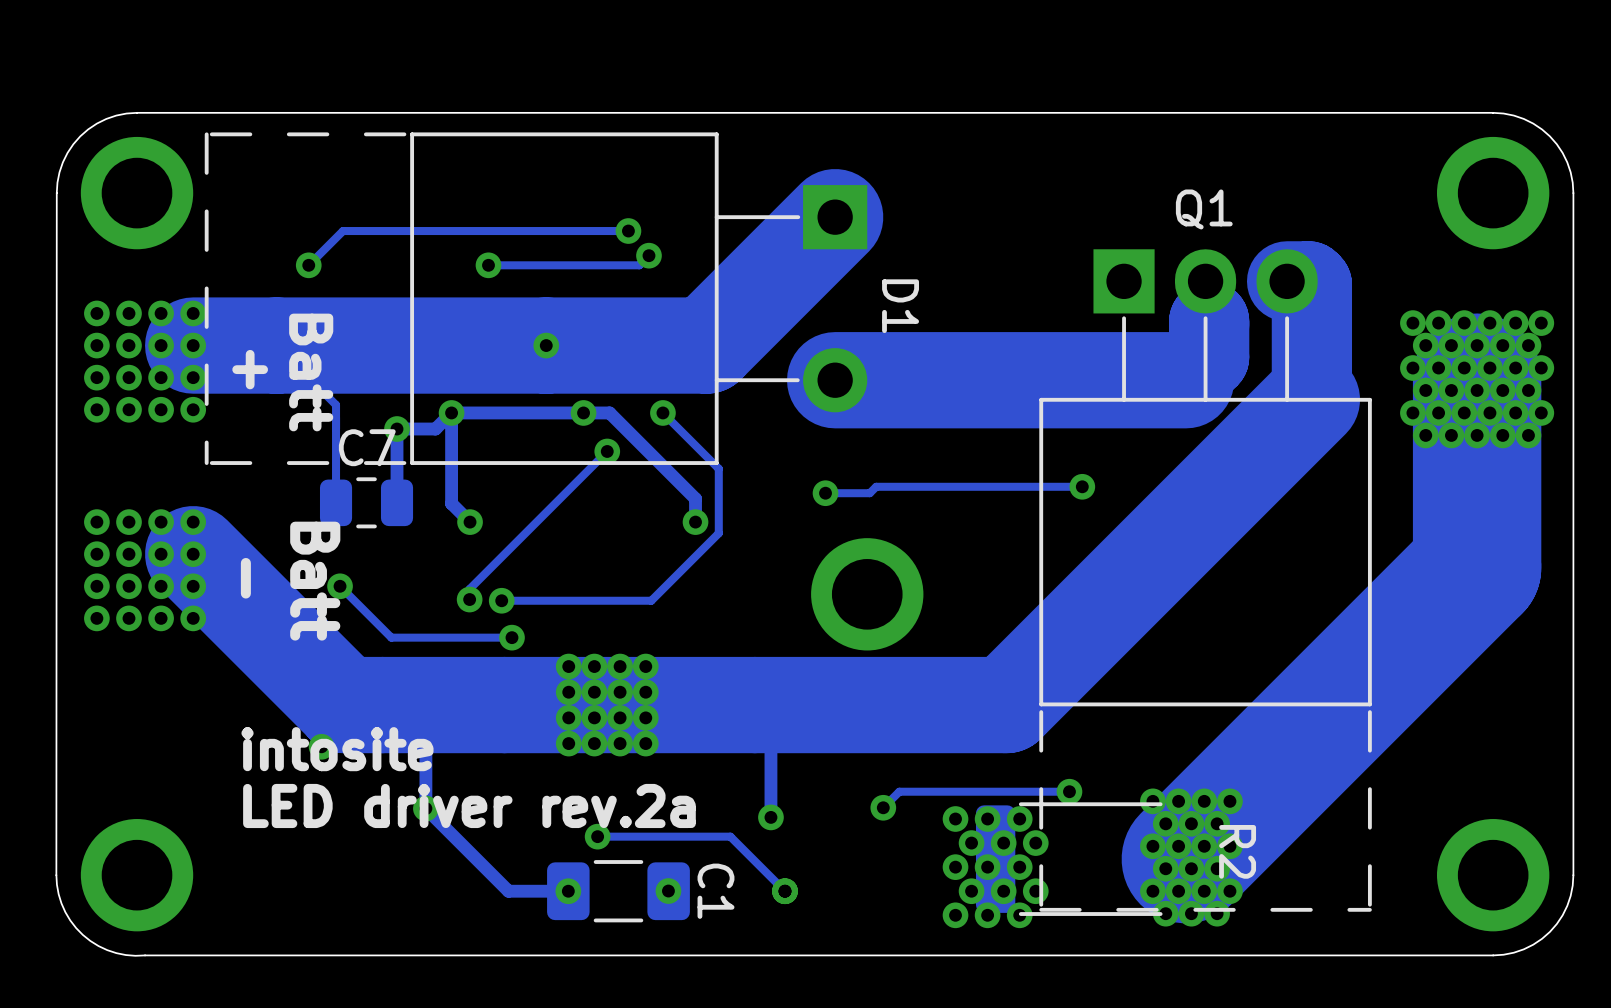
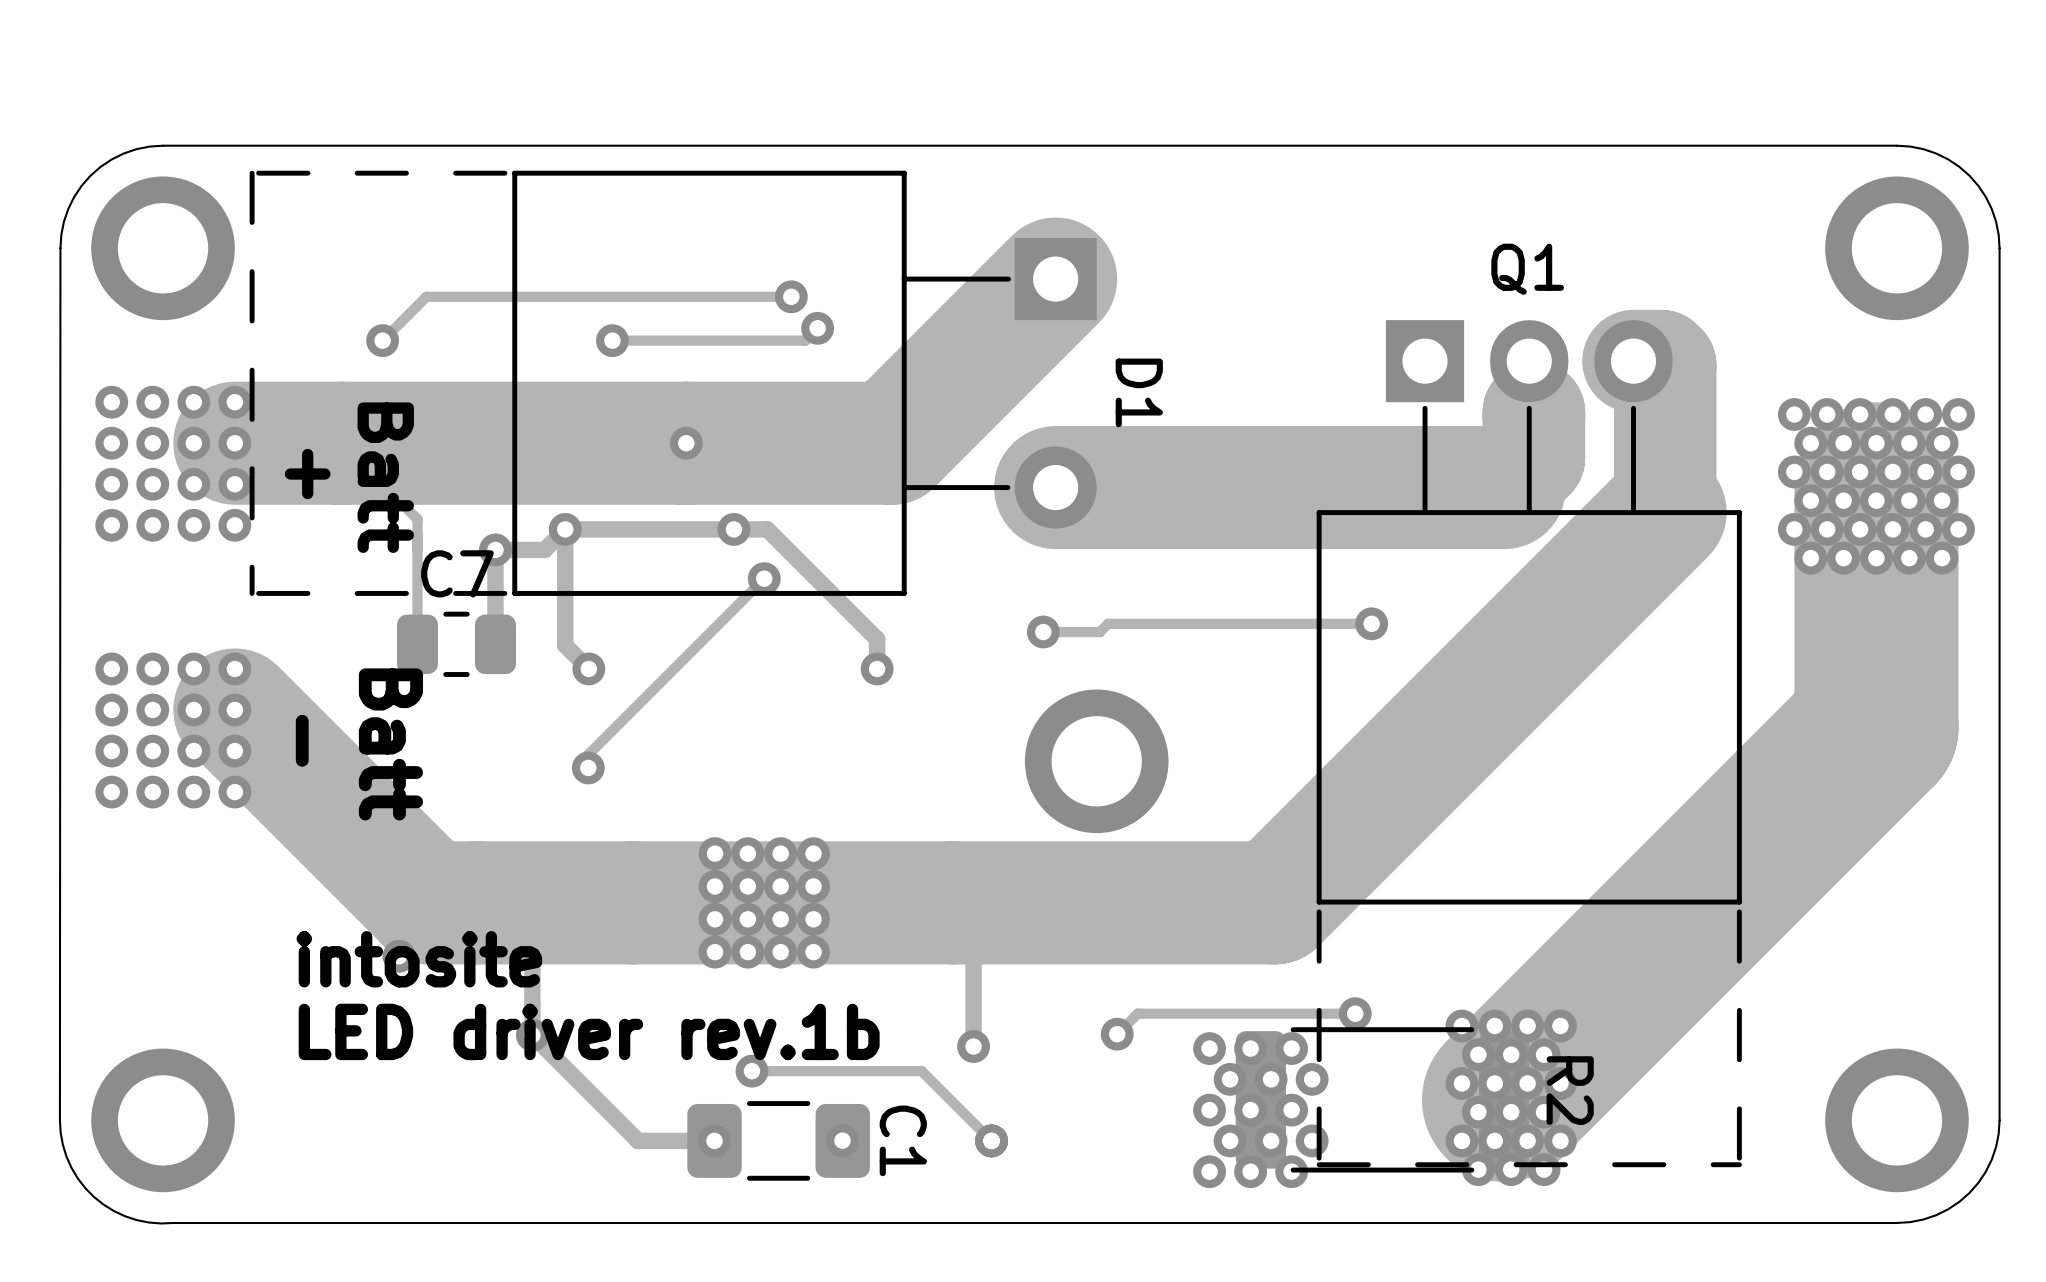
track: (662, 412) (718, 468) (718, 533) (651, 600) (501, 600) -> none
via: (662, 412) -> none
track: (340, 586) (391, 637) (511, 637) -> none
via: (340, 586) -> none
via: (501, 600) -> none
via: (511, 637) -> none
text: LED driver rev.2a (469, 805) -> LED driver rev.1b (589, 1031)

